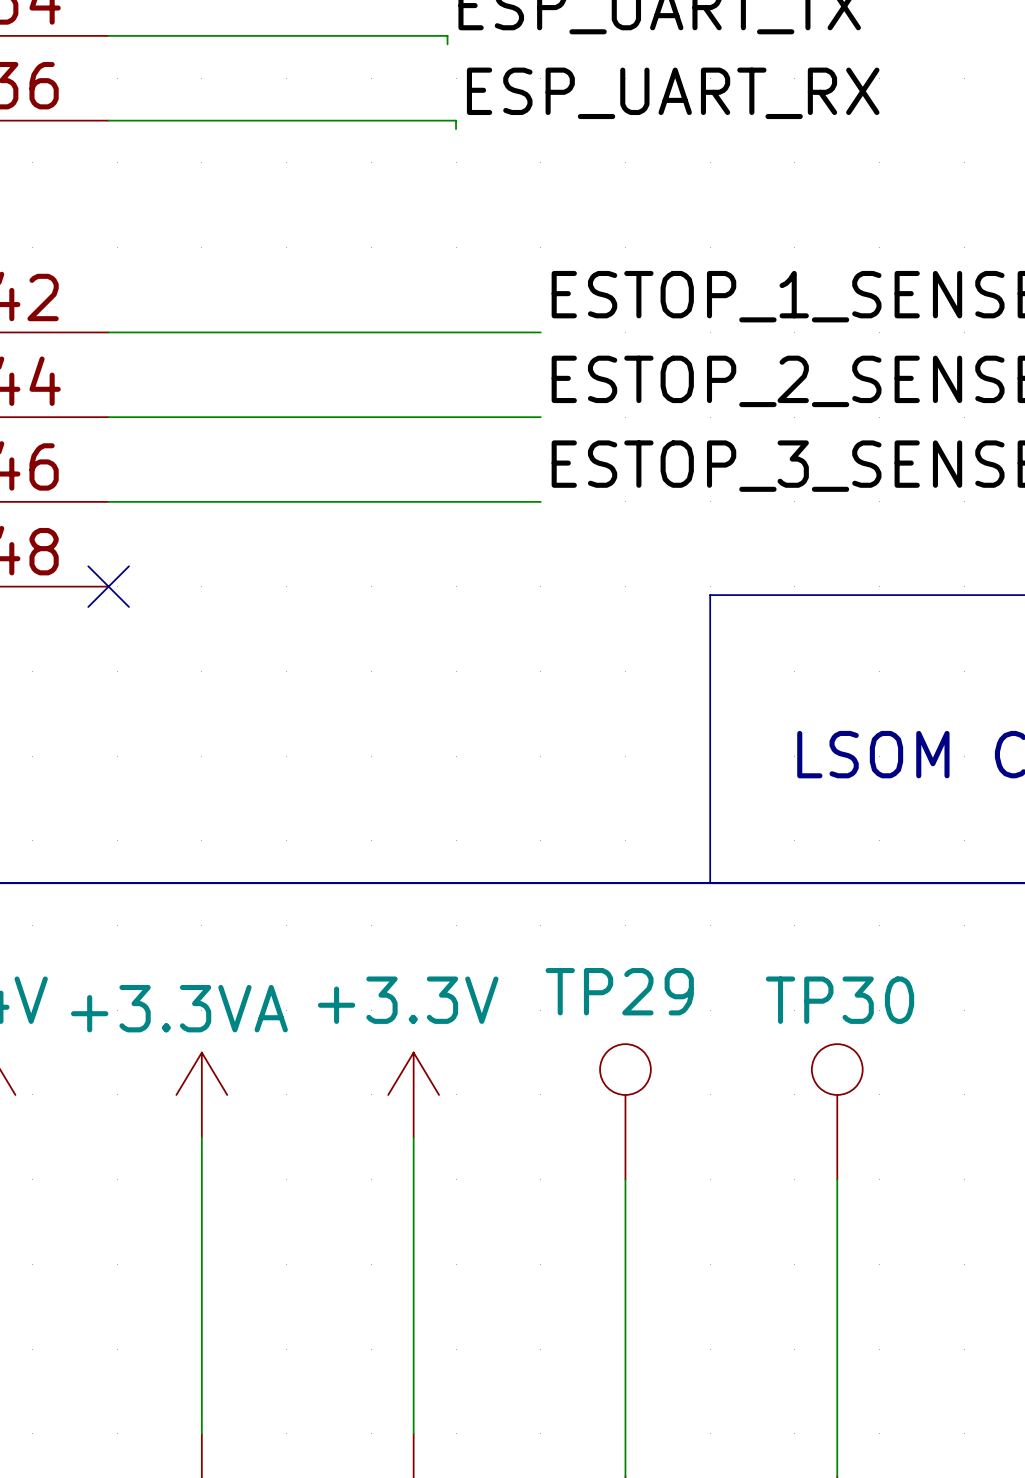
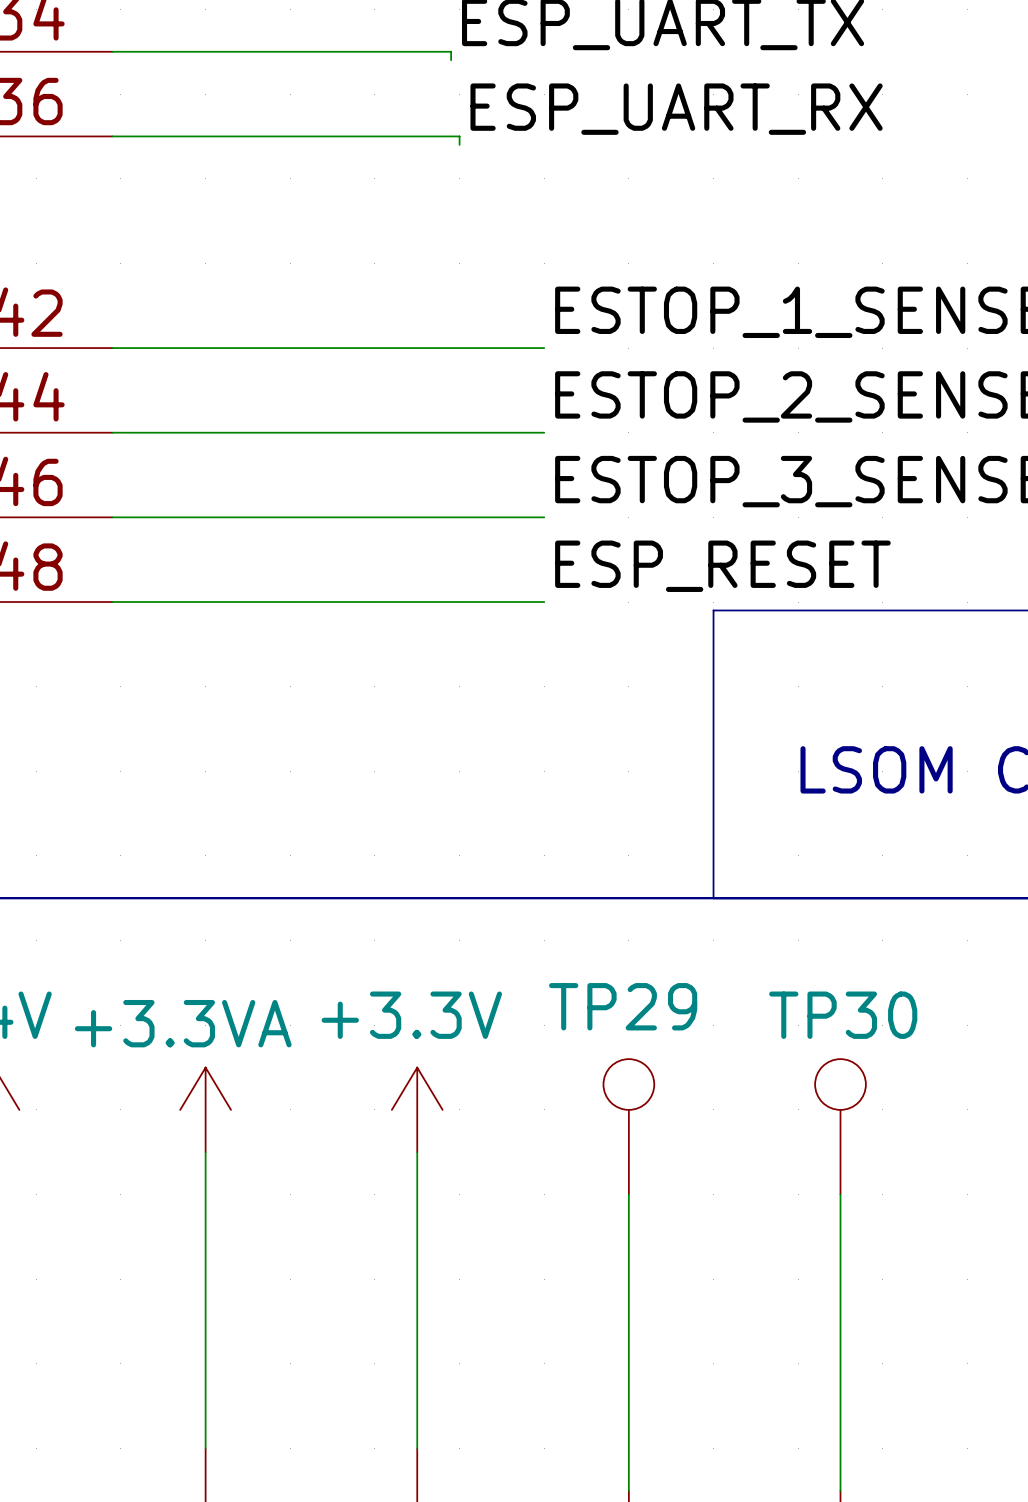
label: none -> ESP_RESET (722, 566)
wire: none -> (112, 602) (544, 602)
no-connect mark: (108, 586) -> none

